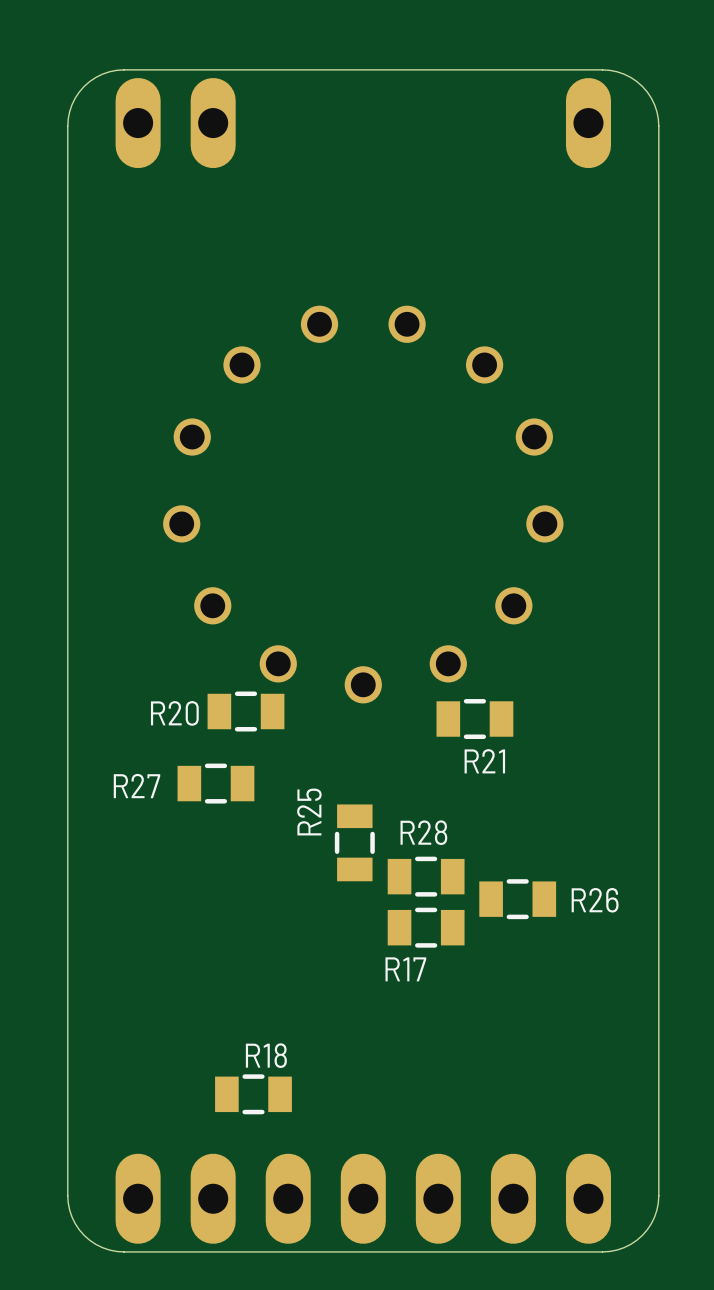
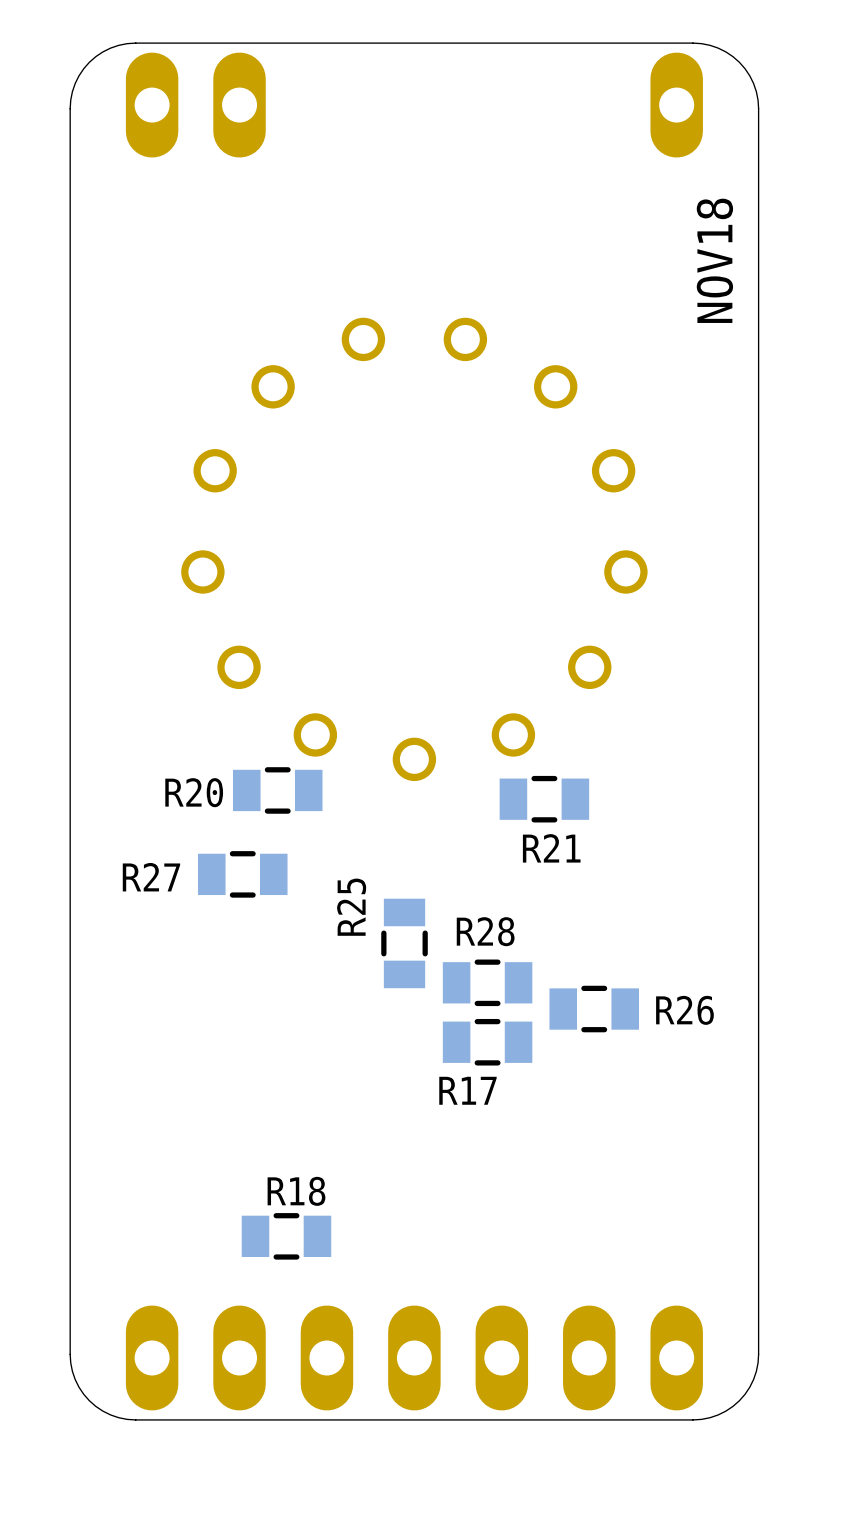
text: none -> NOV18 (714, 260)

